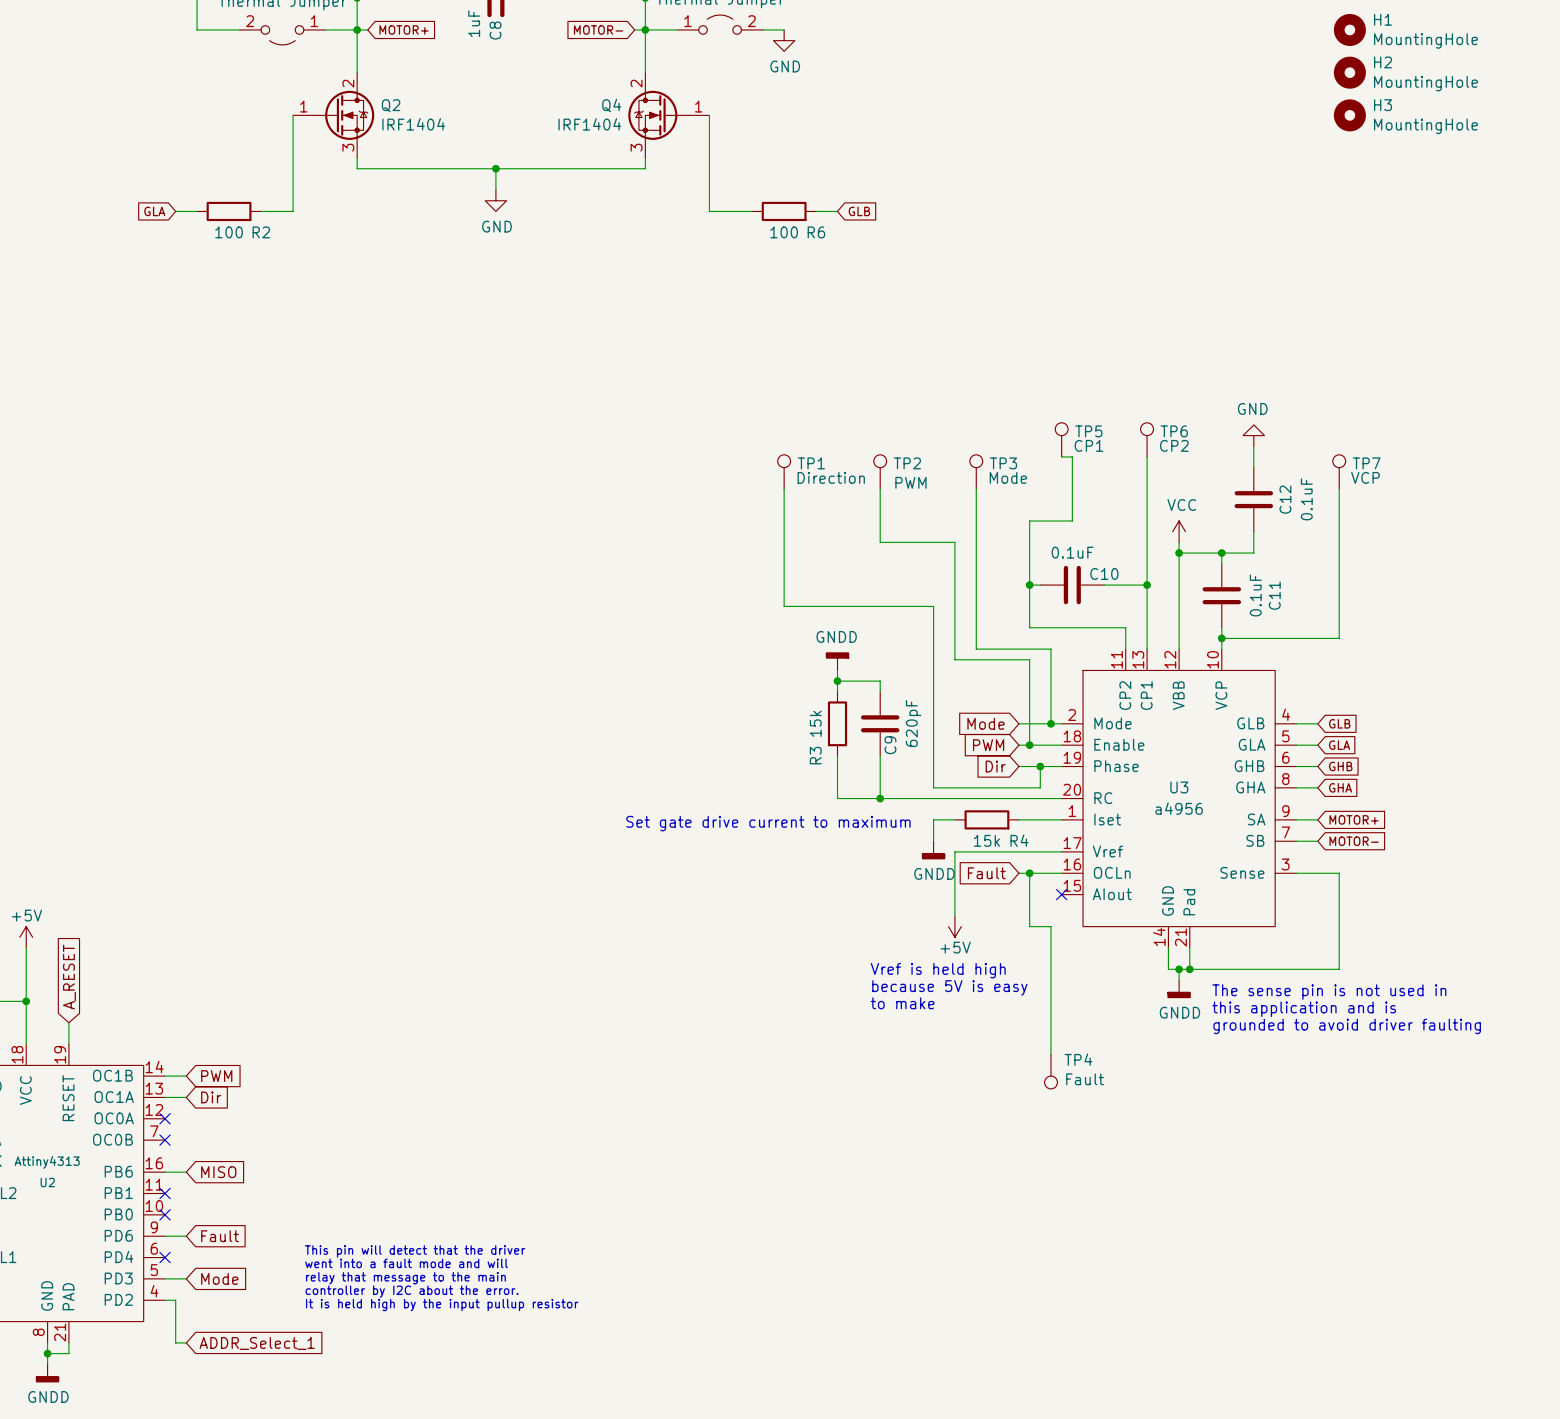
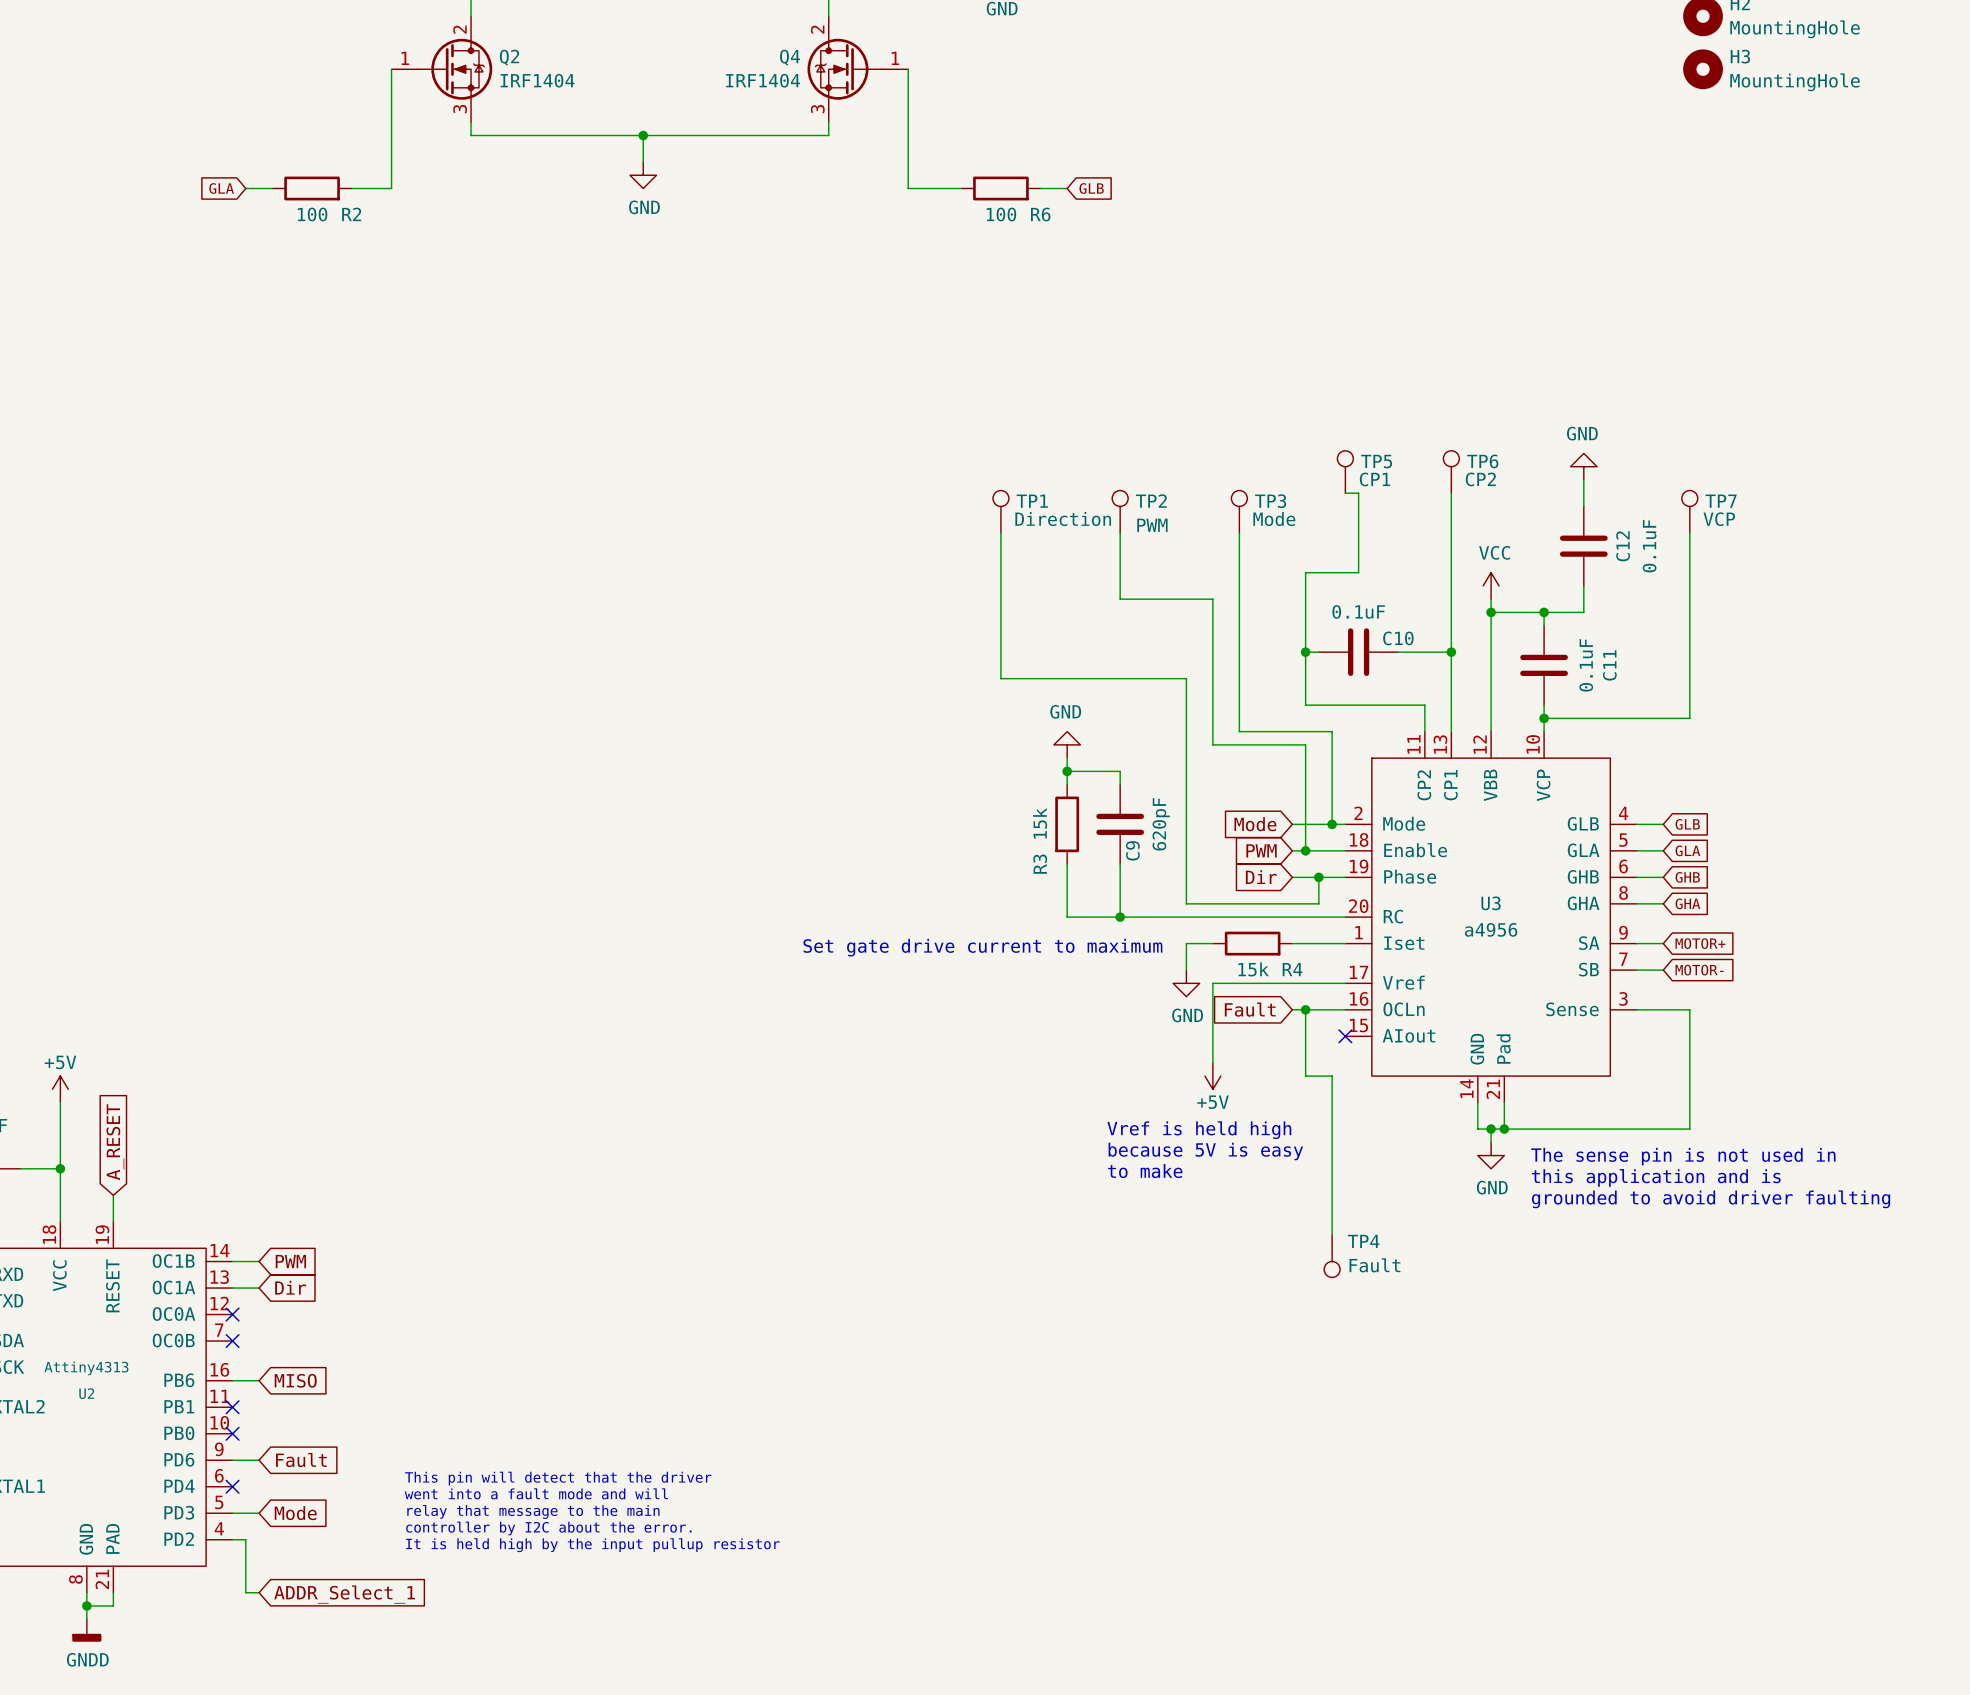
power symbol: GNDD (837, 661) -> GND (1067, 744)
power symbol: GNDD (933, 850) -> GND (1186, 983)
power symbol: GNDD (1179, 989) -> GND (1491, 1155)

